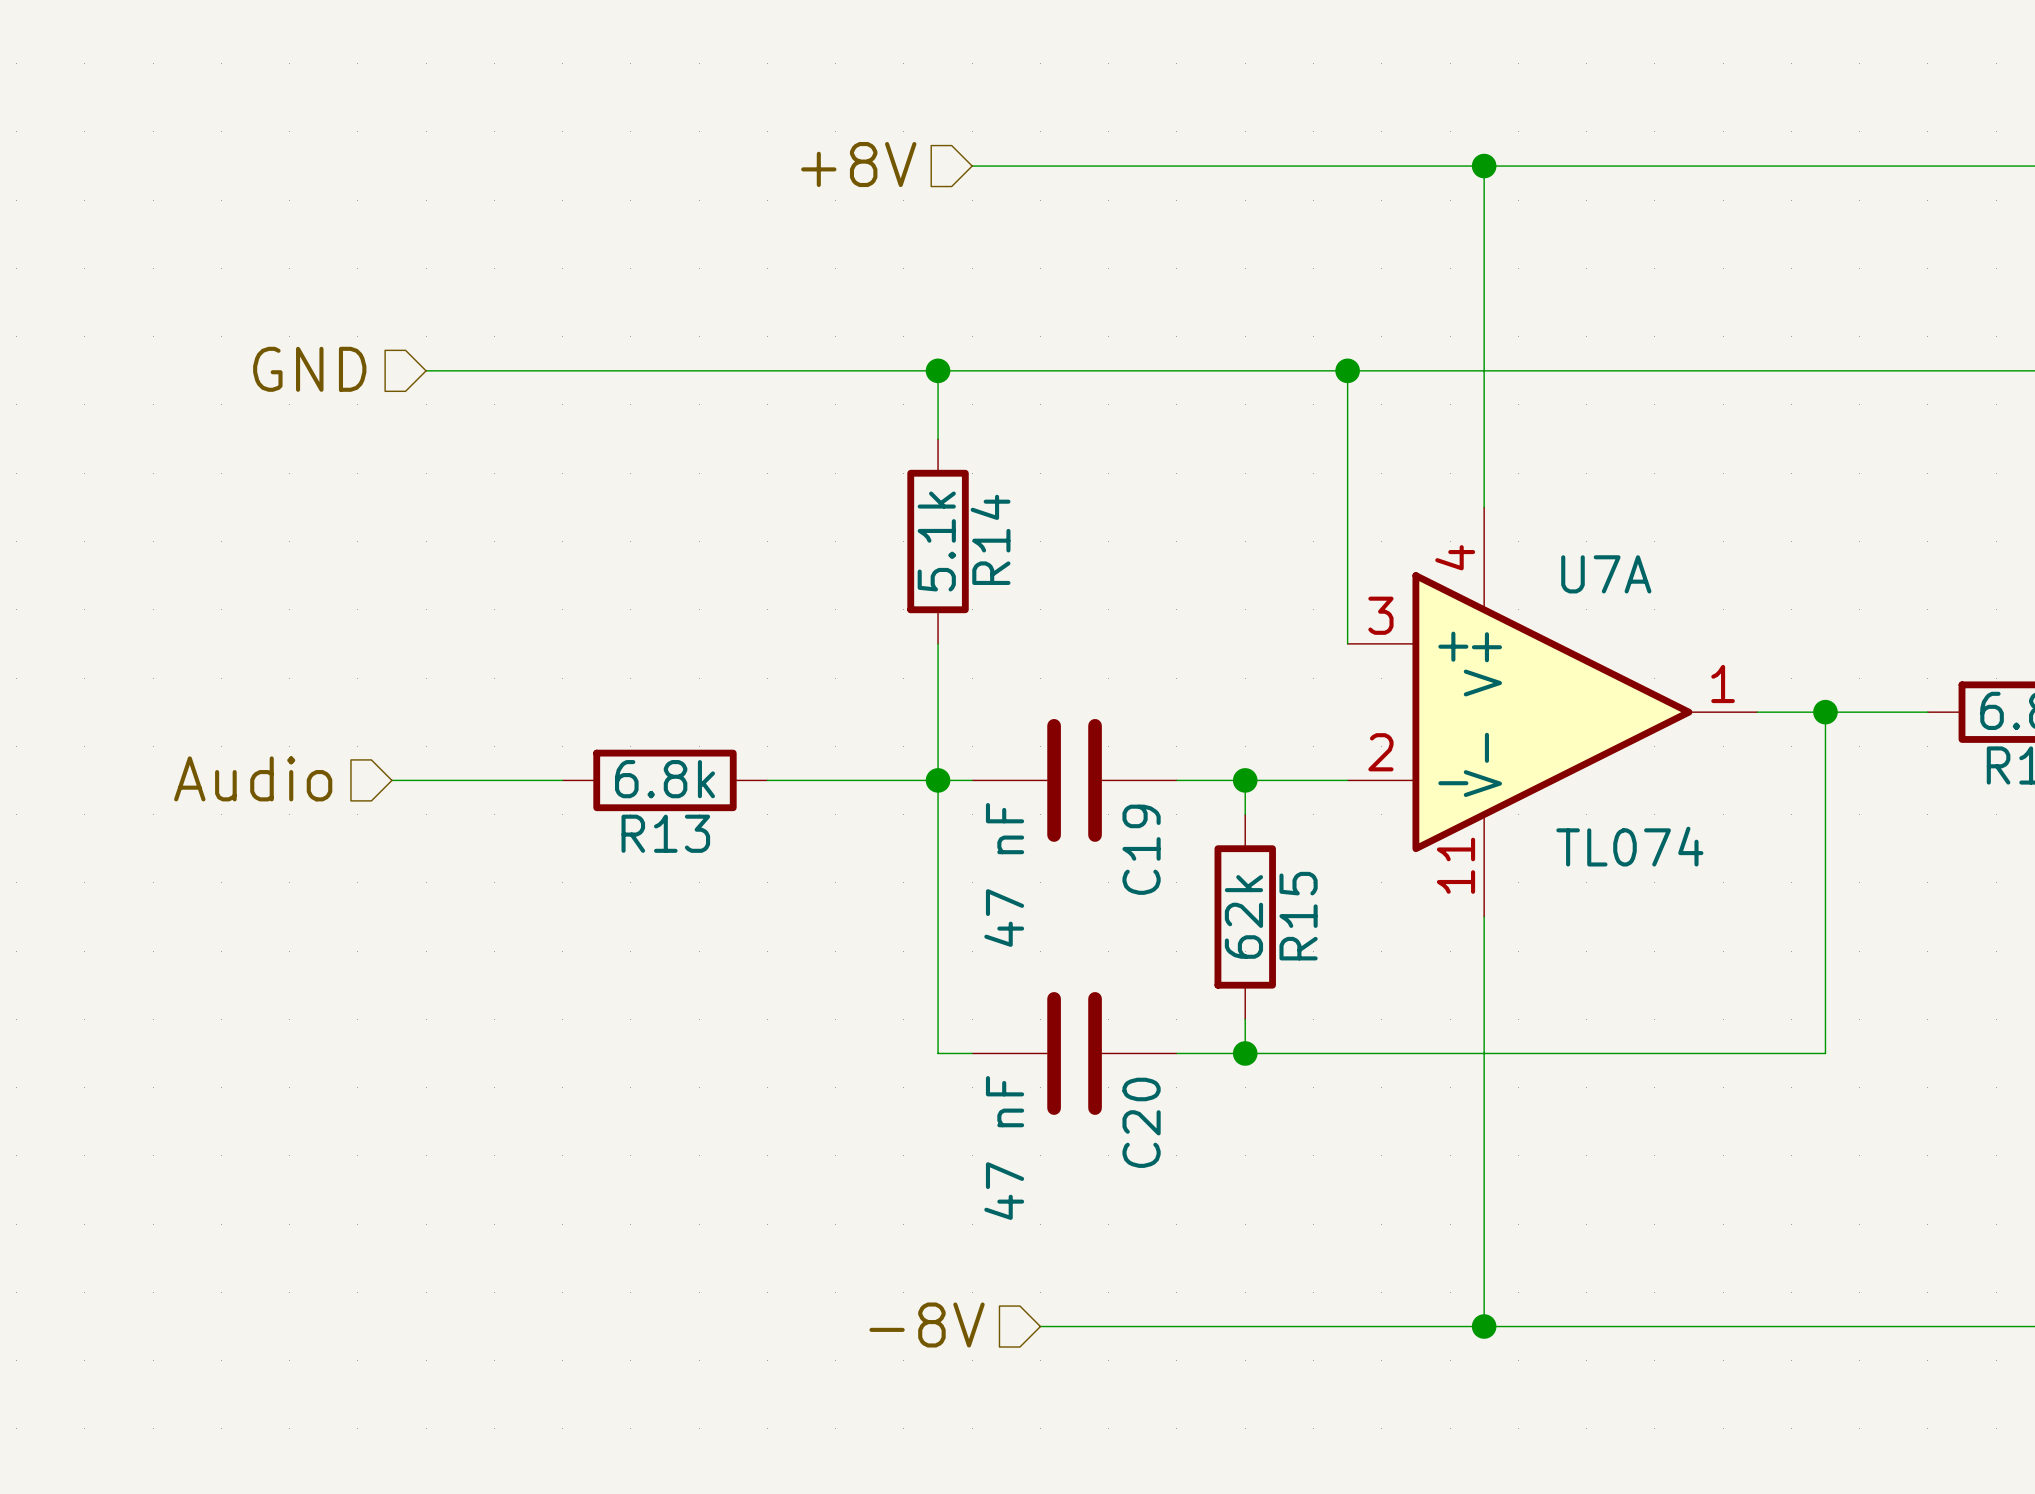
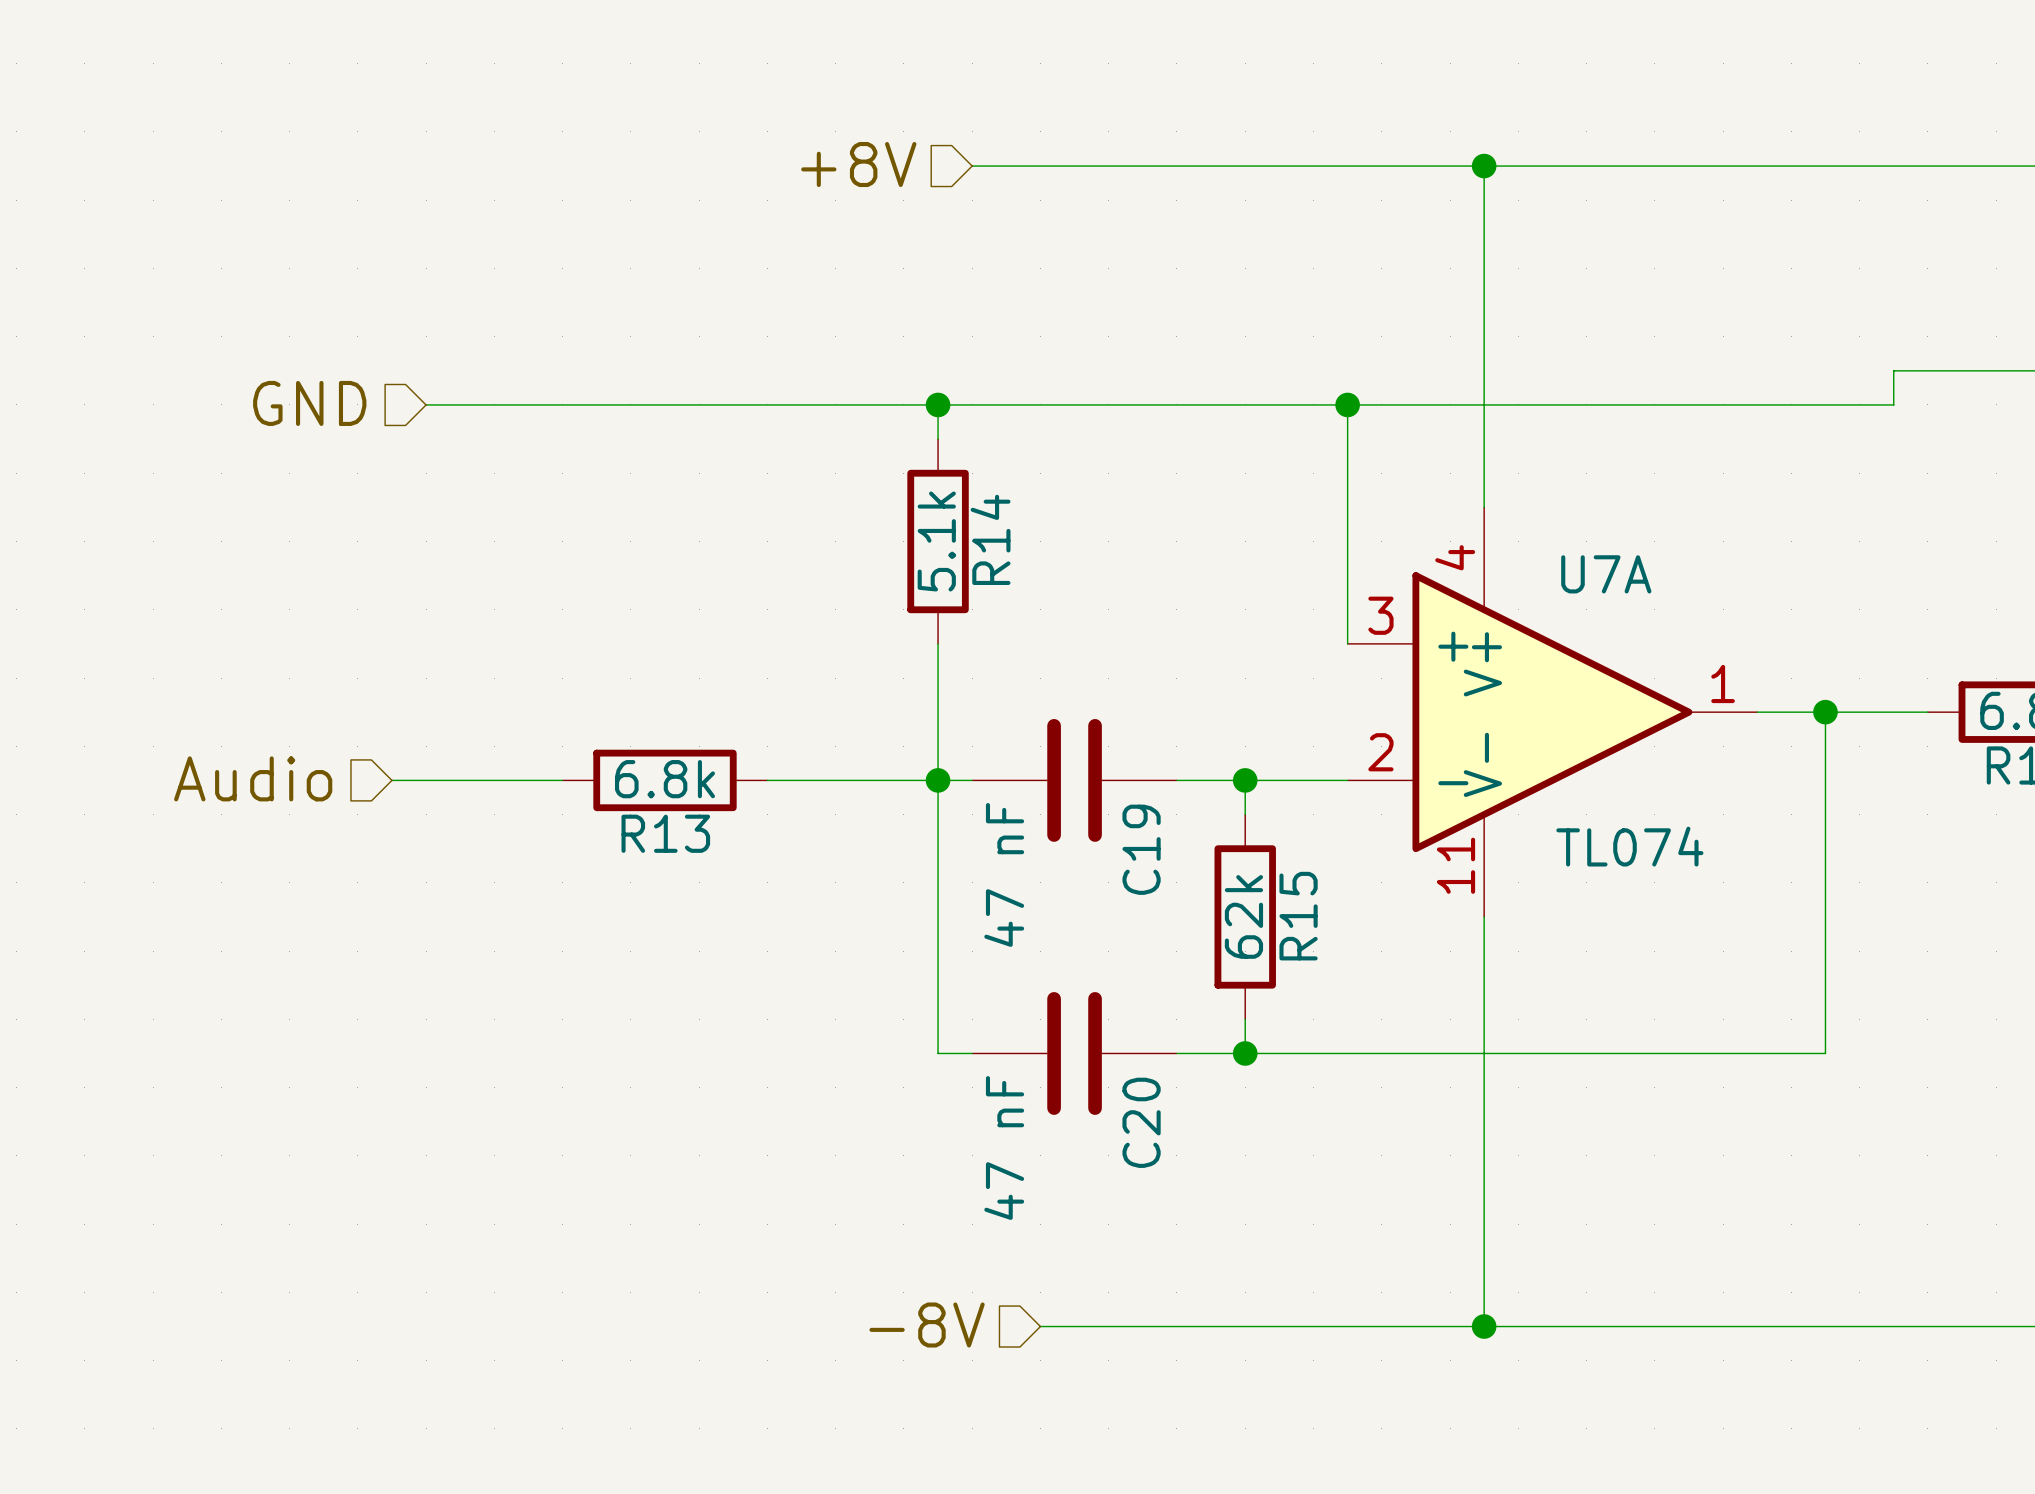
hierarchical label position: GND (309, 369) -> GND (309, 403)
wire: (426, 370) (1893, 370) -> (426, 404) (1893, 404) (1893, 370)
wire: (938, 370) (938, 404) -> none
junction position: (938, 370) -> (938, 404)
wire: (1347, 370) (1347, 404) -> none
junction position: (1347, 370) -> (1347, 404)

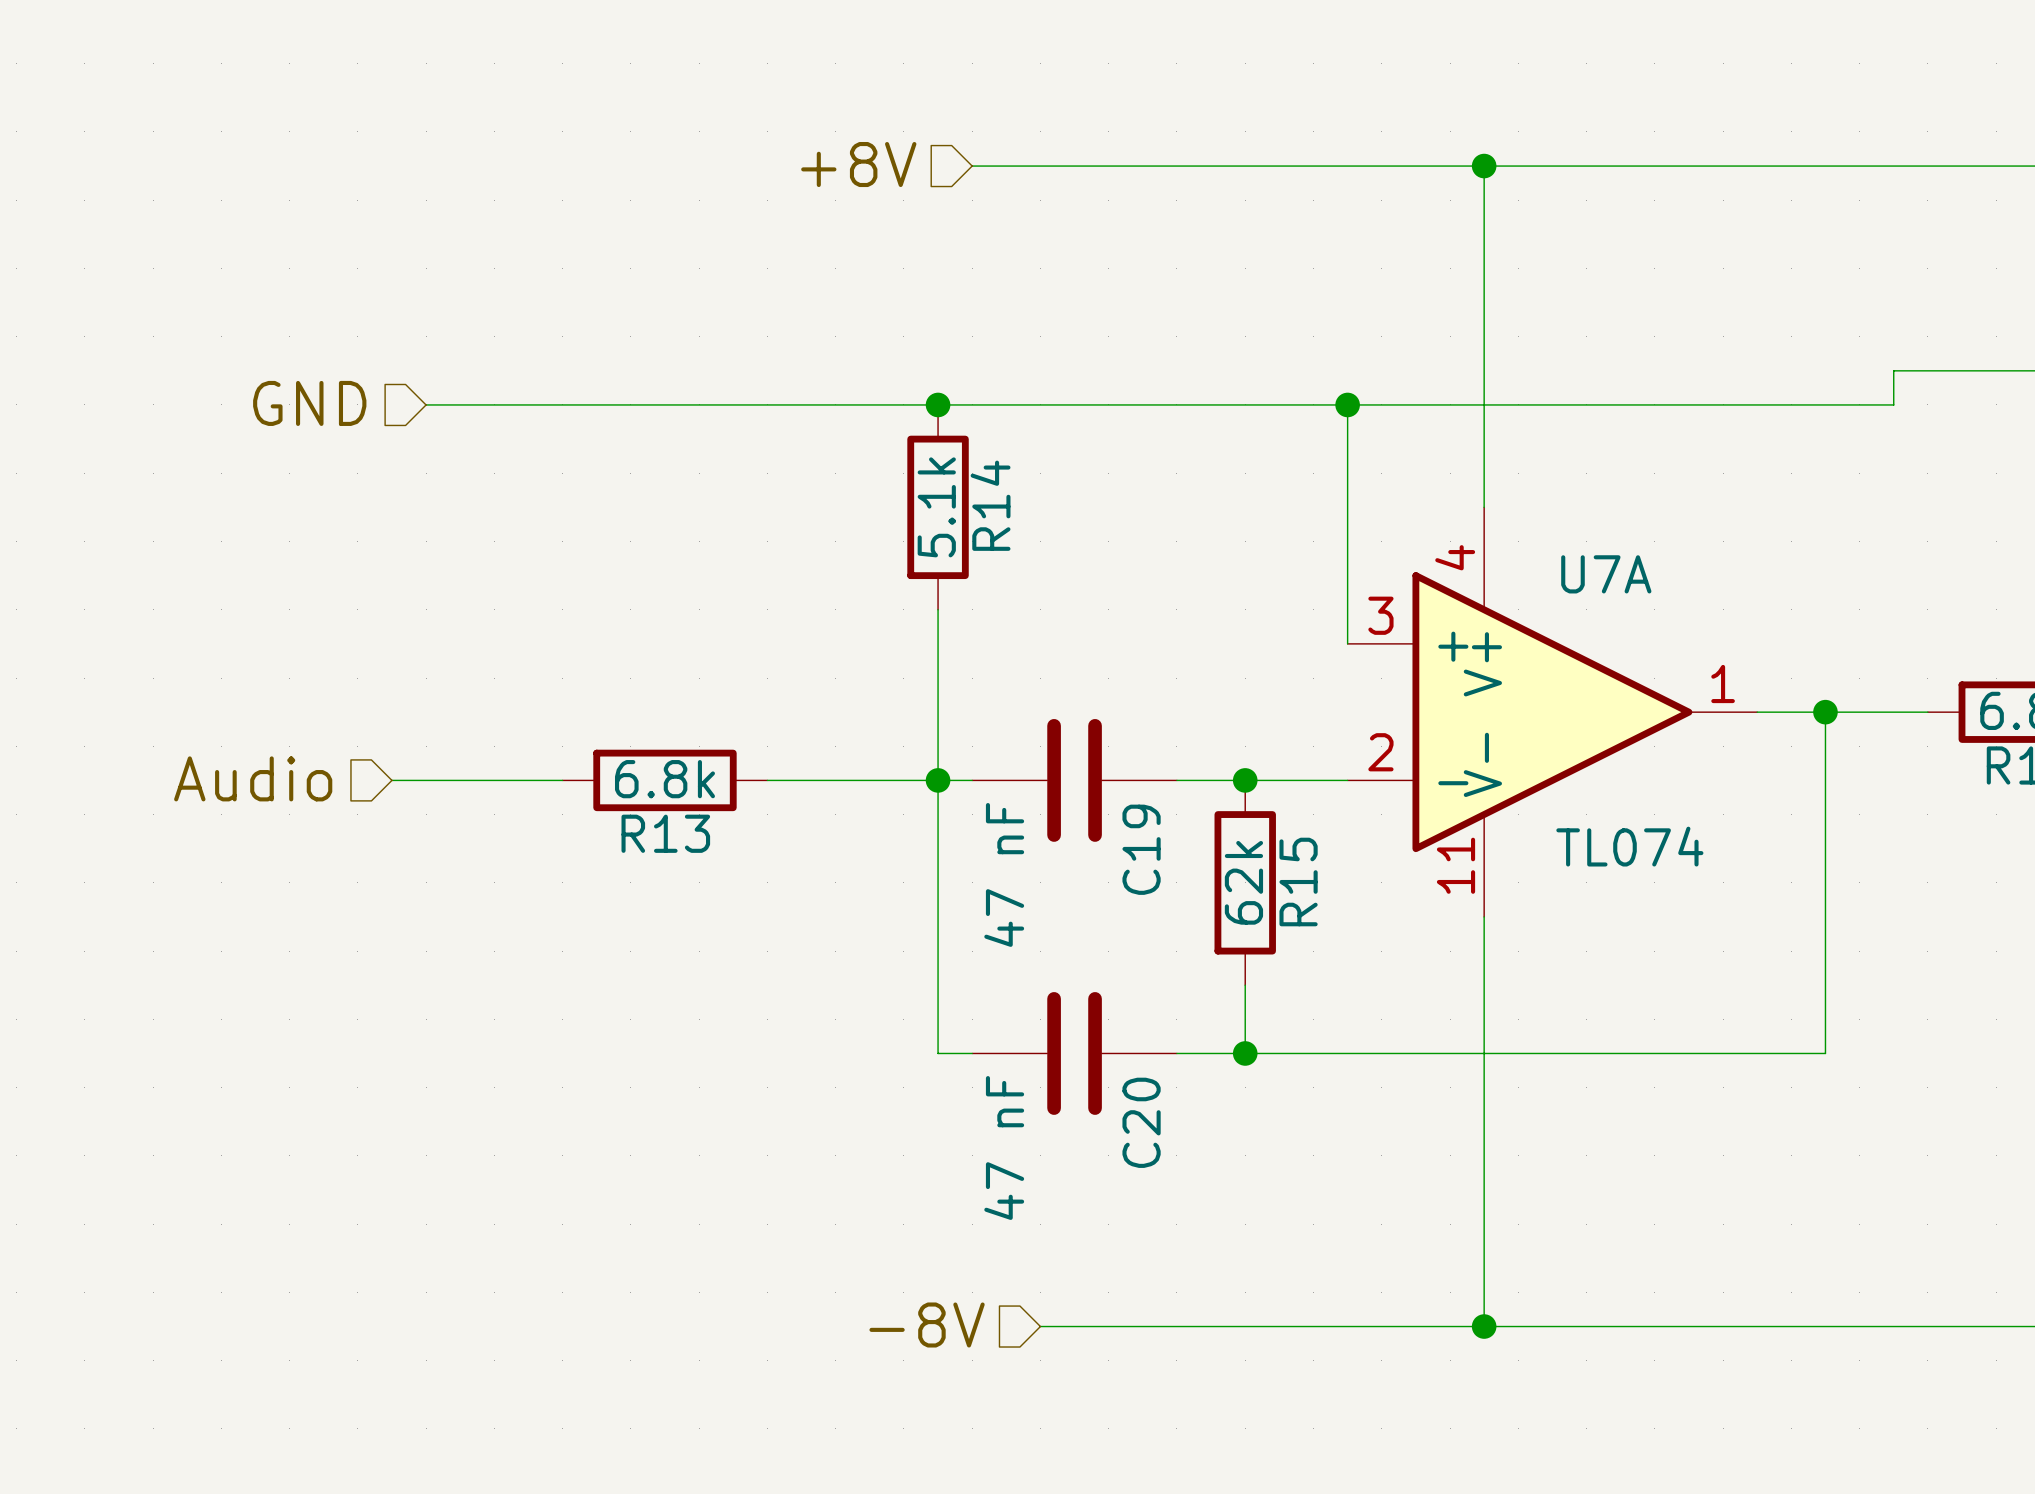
R14 position: (938, 541) -> (938, 507)
R15 position: (1245, 916) -> (1245, 882)

